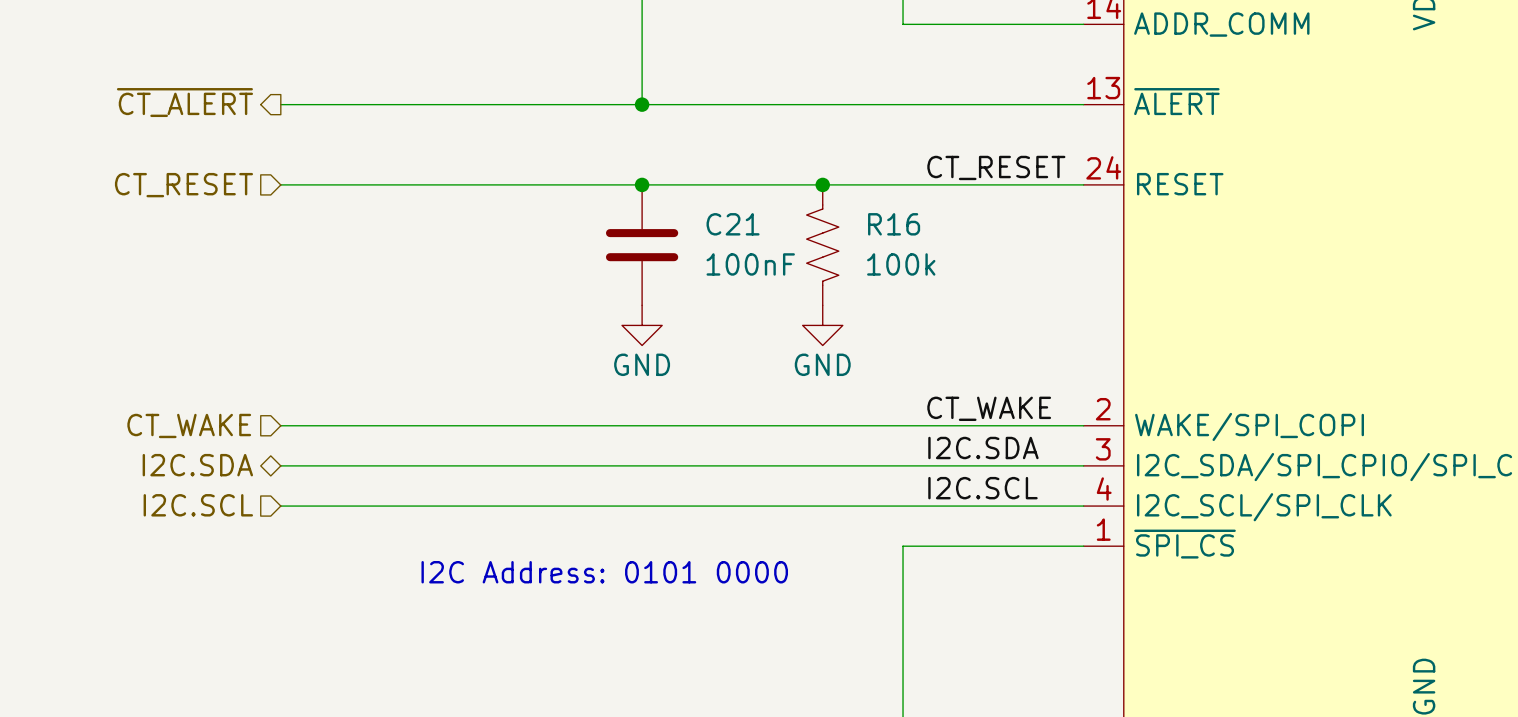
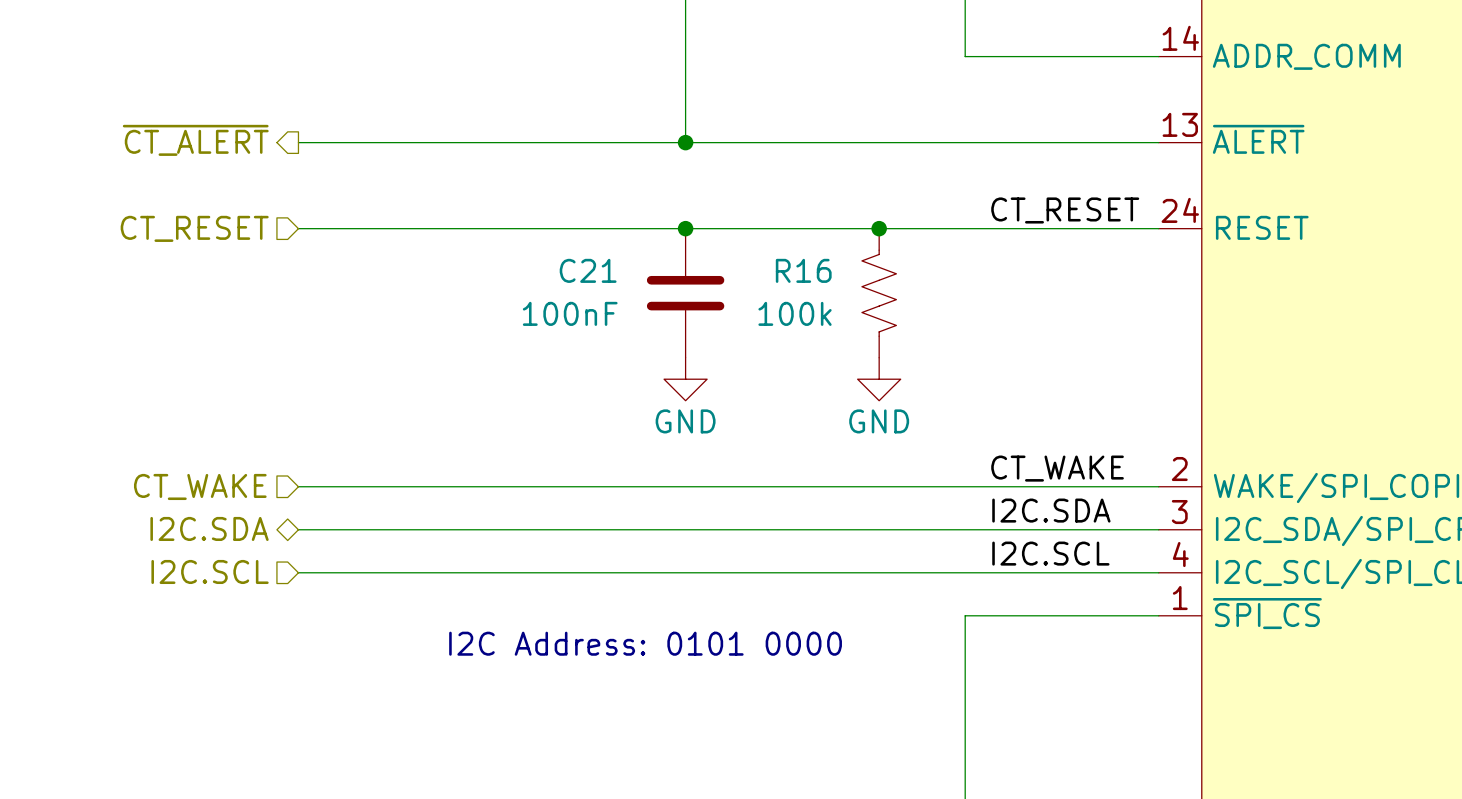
C21 name position: C21 (733, 224) -> C21 (588, 270)
R16 name position: R16 (894, 224) -> R16 (803, 270)
C21 value position: 100nF (750, 264) -> 100nF (570, 313)
R16 value position: 100k (901, 264) -> 100k (795, 313)

